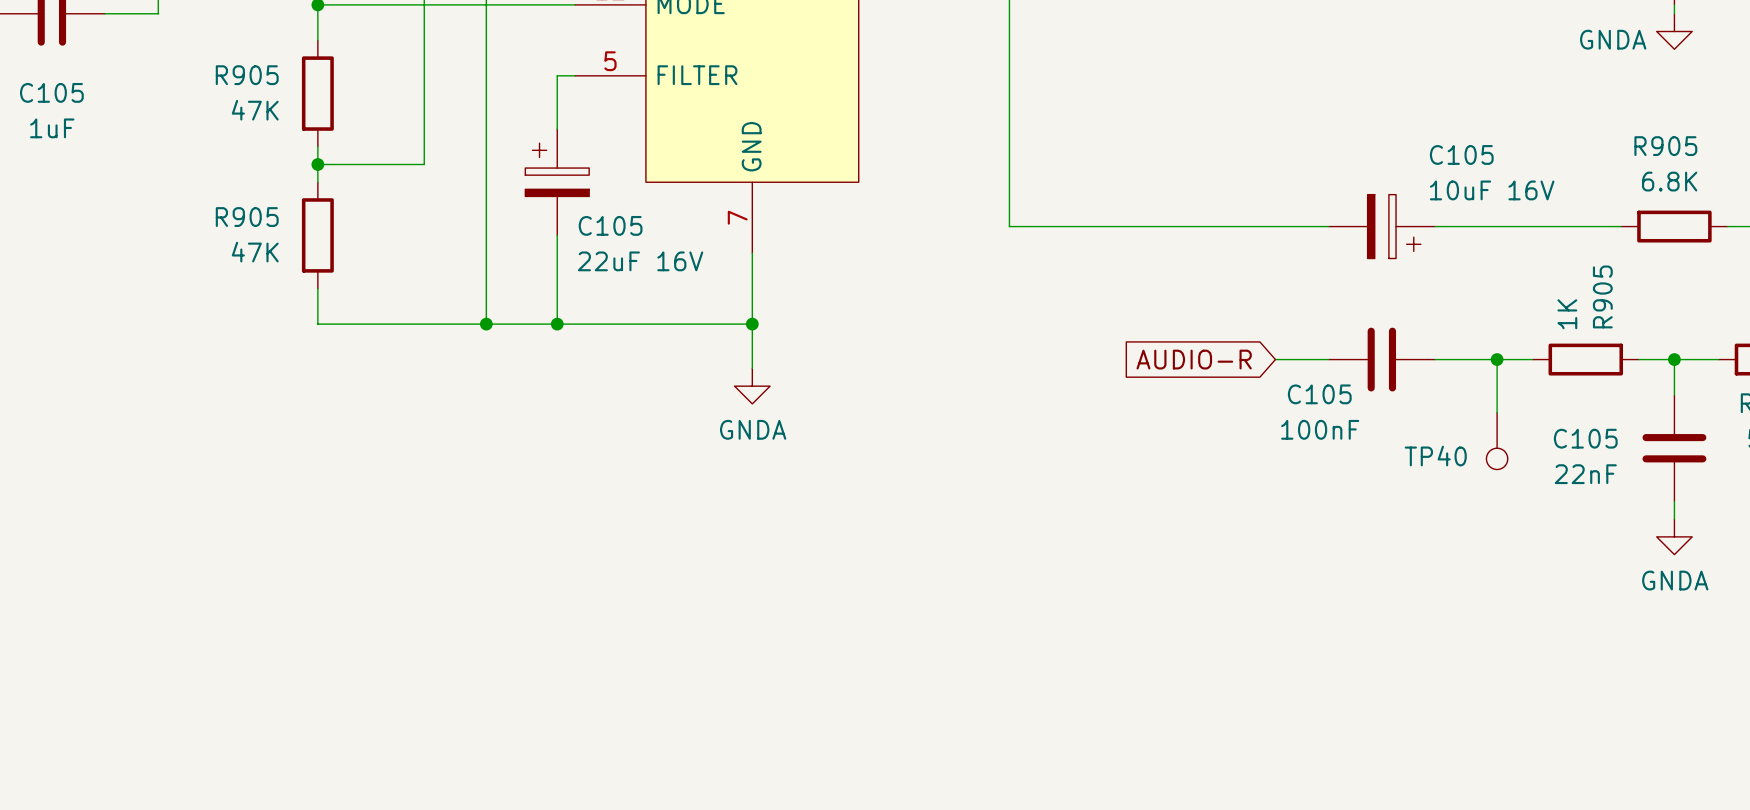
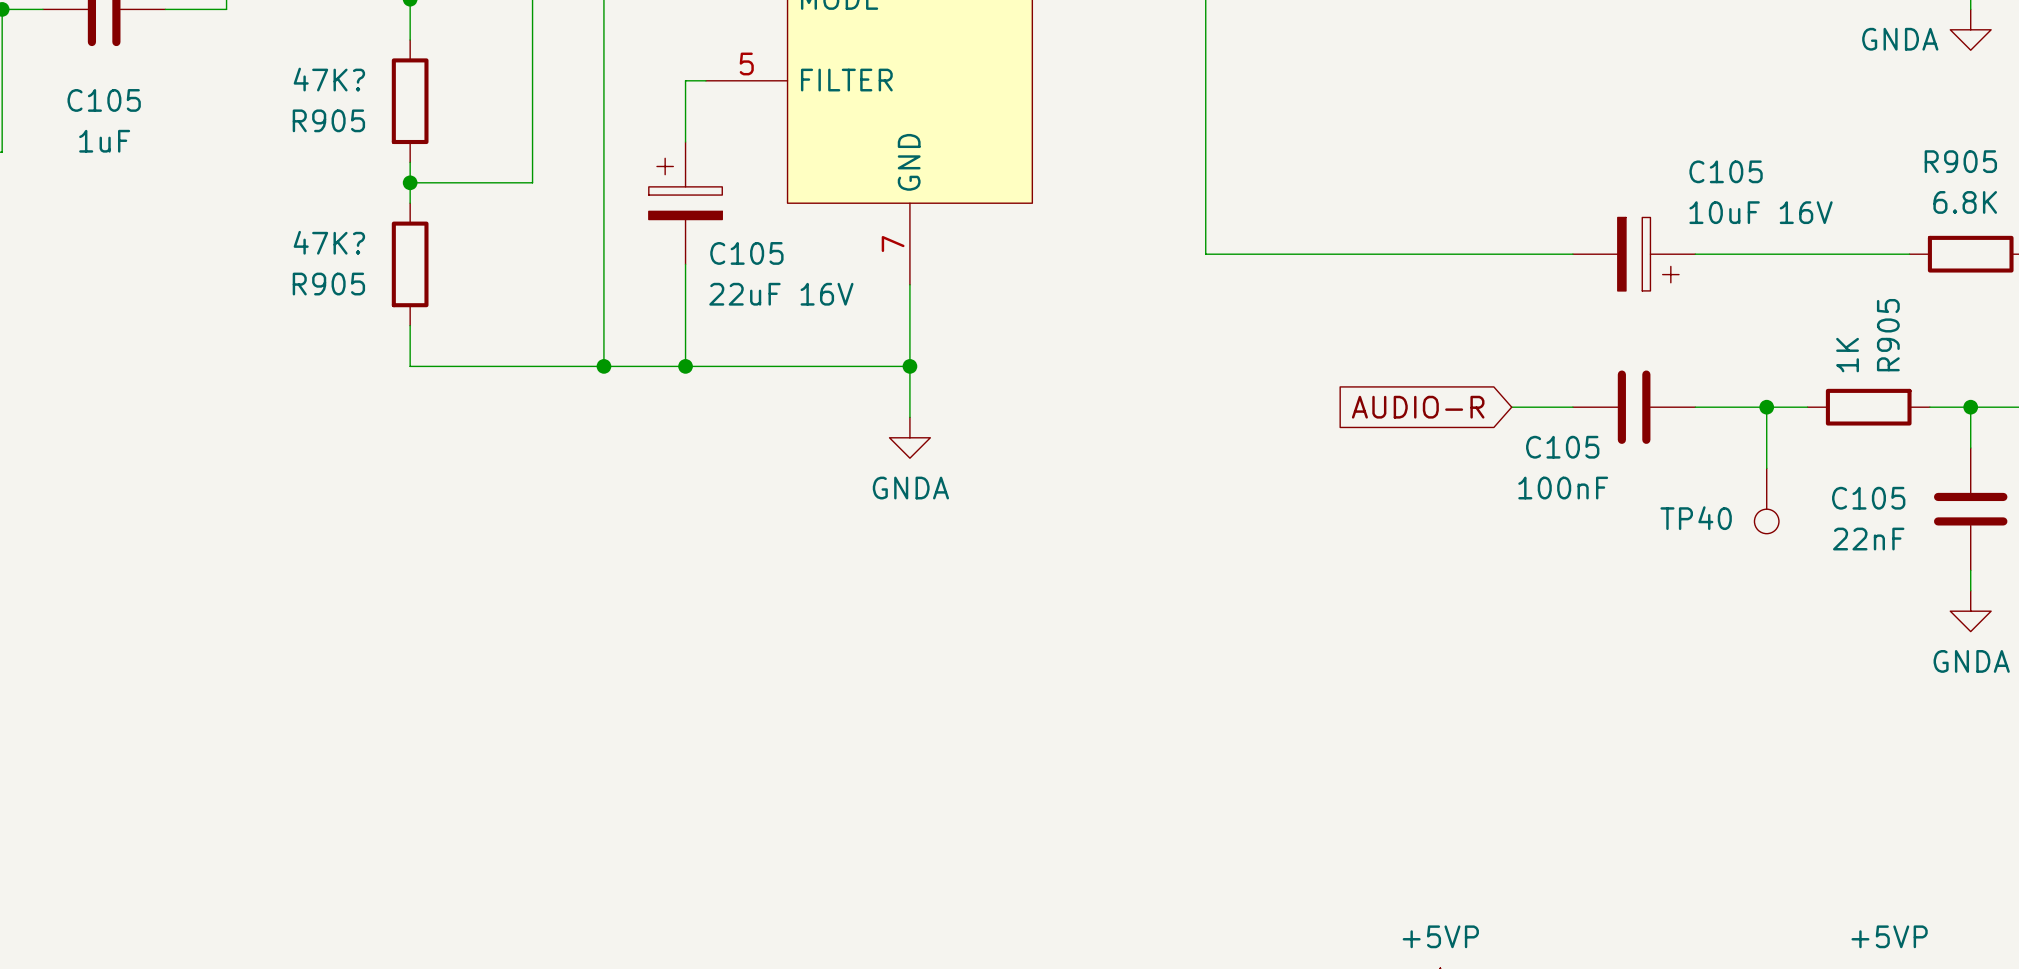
R905 name position: R905 (247, 75) -> R905 (328, 120)
R905 value: 47K (255, 110) -> 47K? (329, 79)
R905 name position: R905 (247, 217) -> R905 (328, 284)
R905 value: 47K (255, 252) -> 47K? (329, 242)

